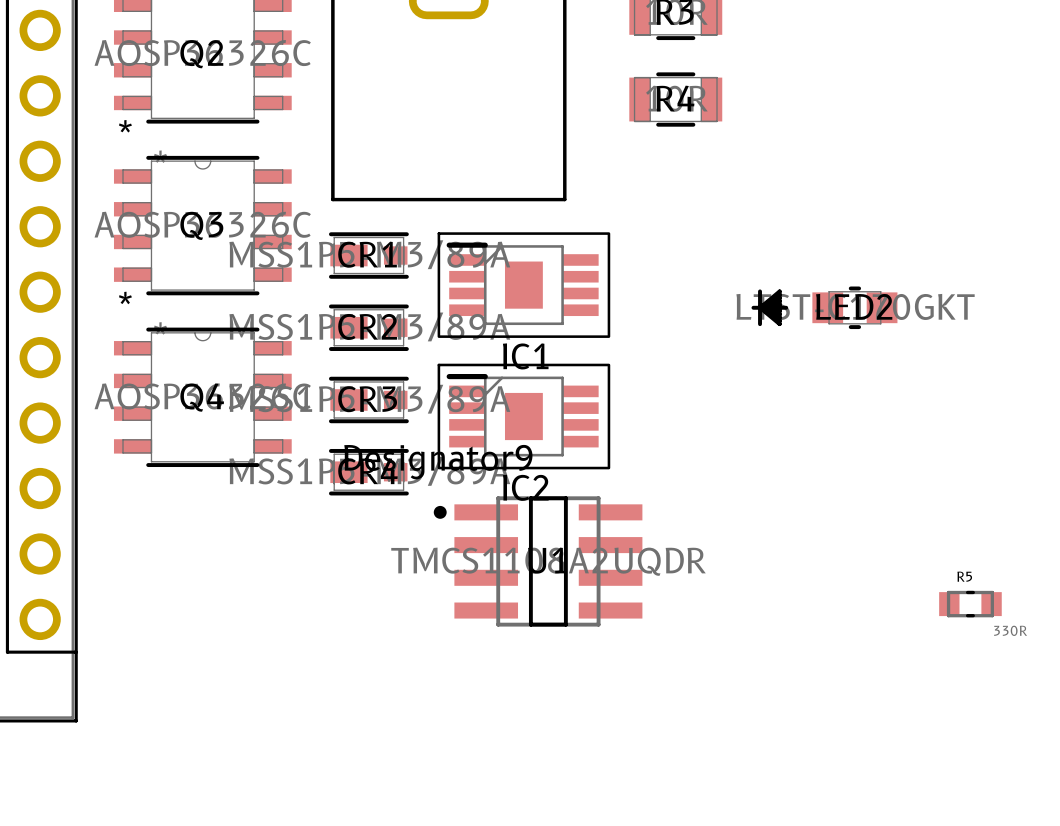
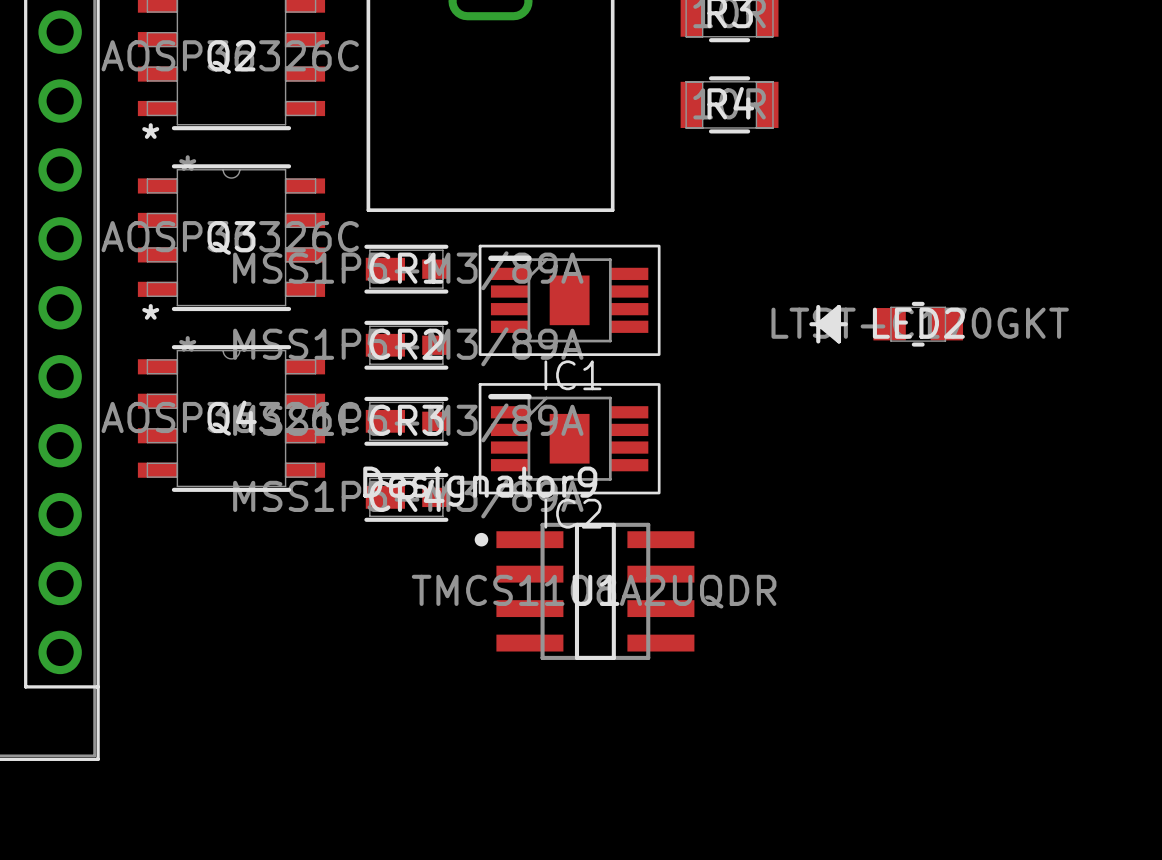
R5: 330R (970, 604) -> none

